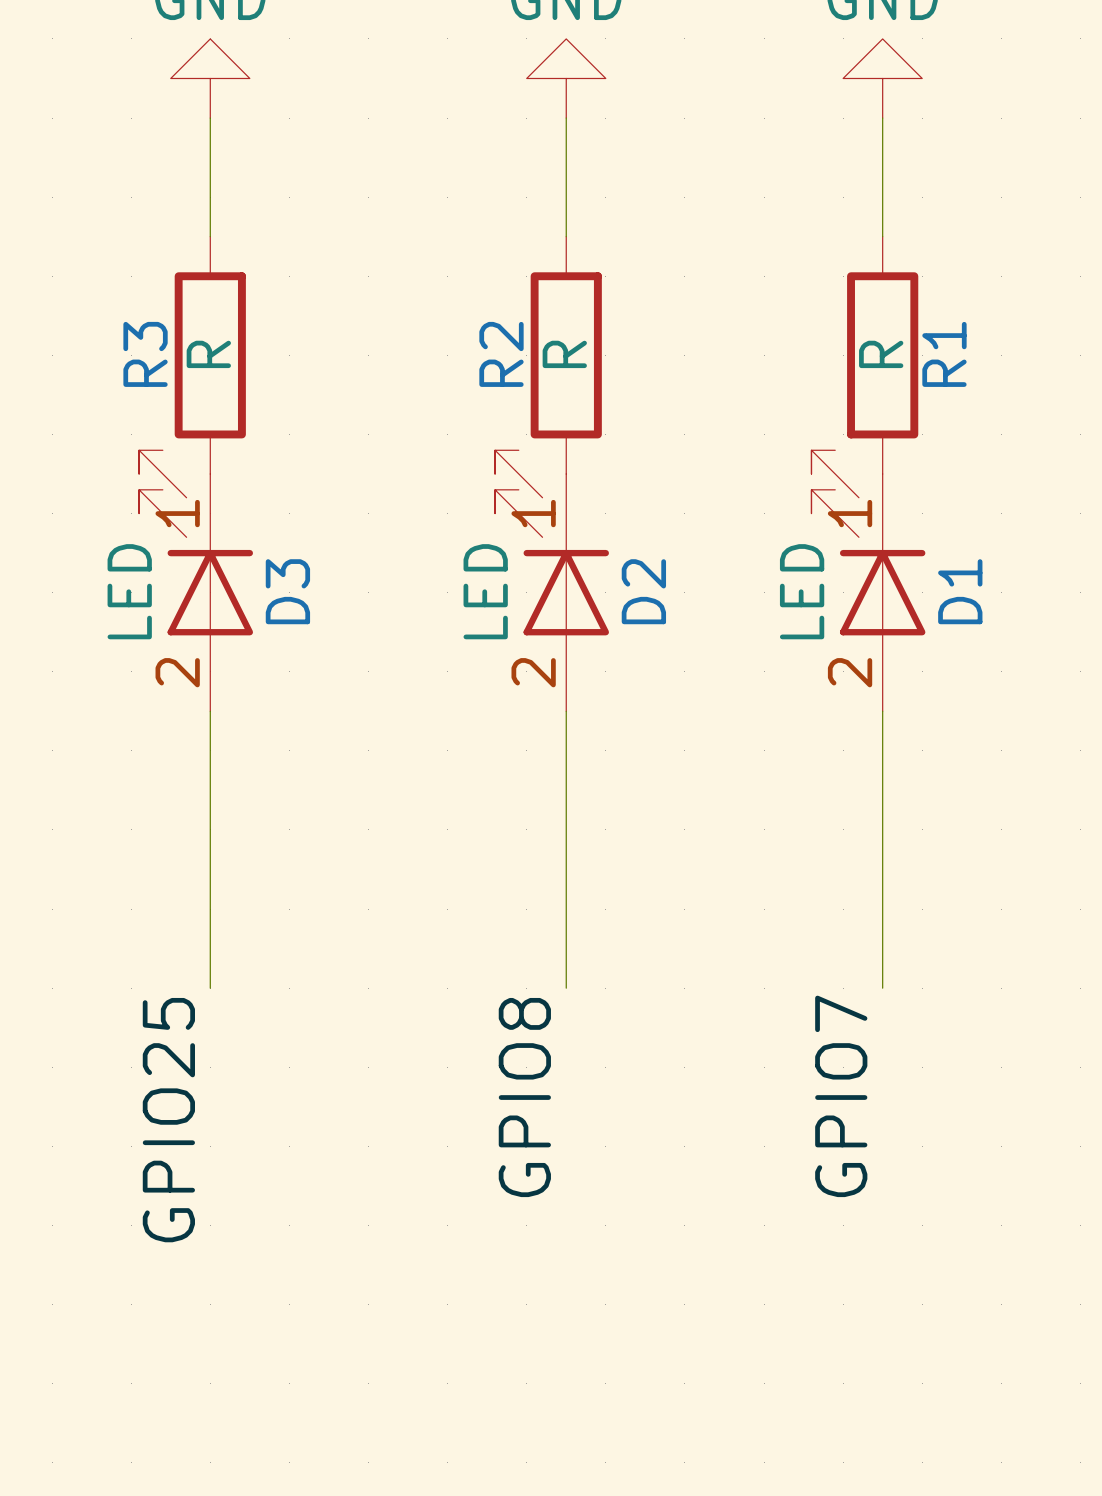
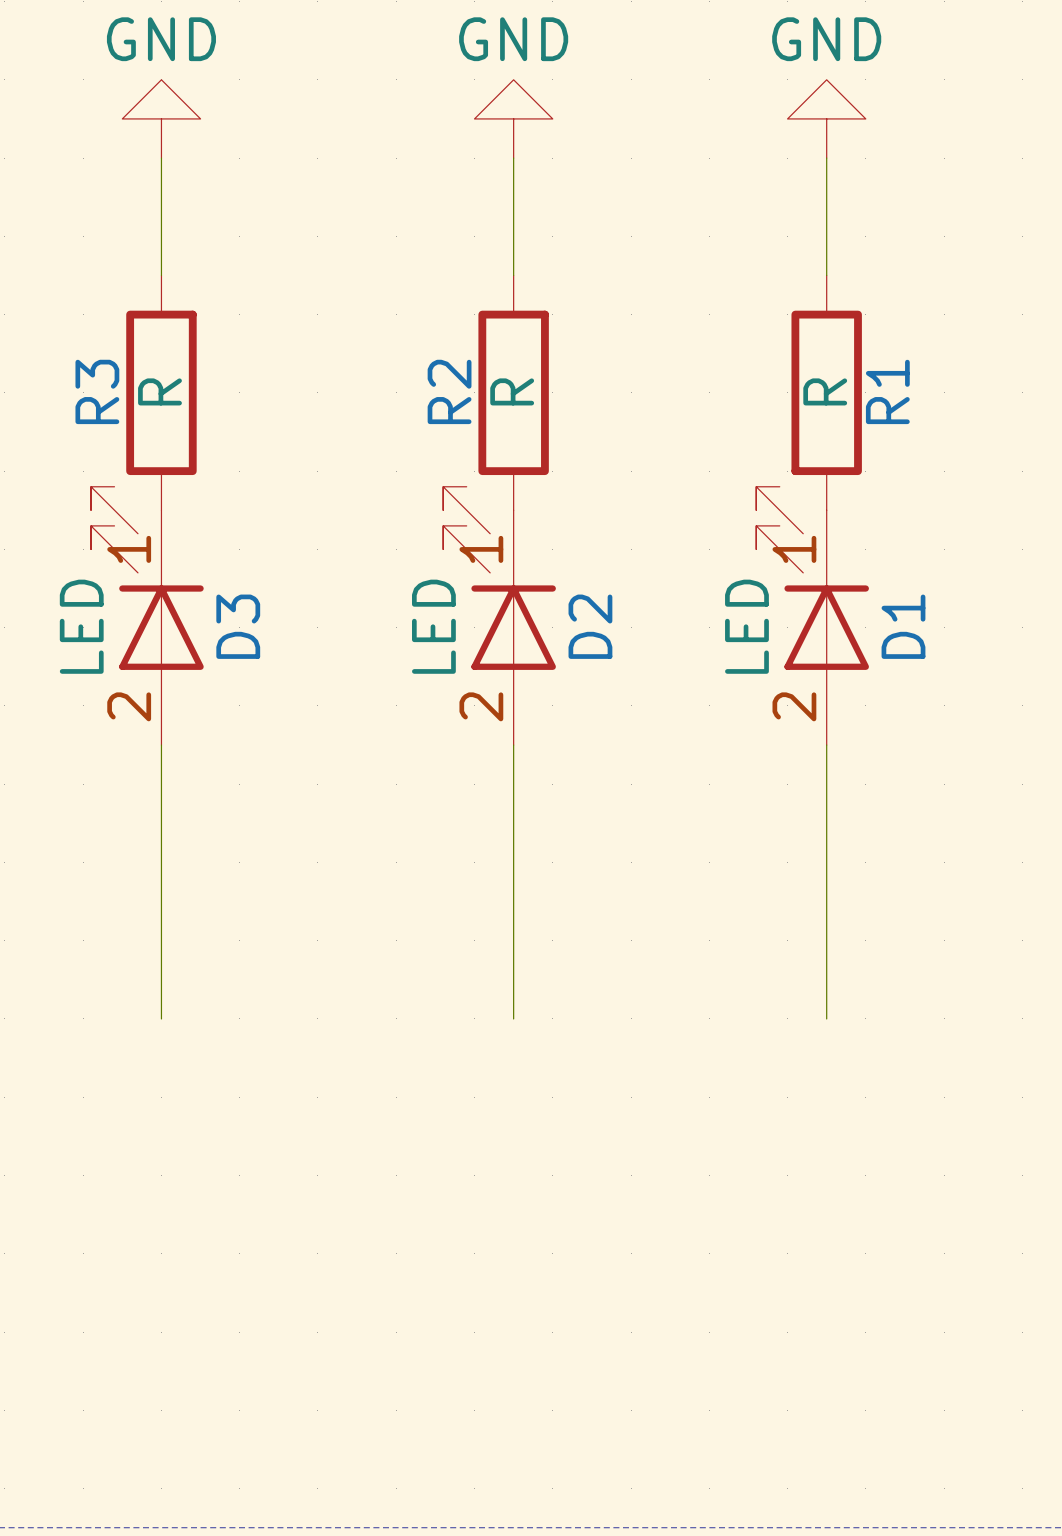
label: GPIO7 (841, 1096) -> none
label: GPIO8 (524, 1097) -> none
label: GPIO25 (168, 1120) -> none

